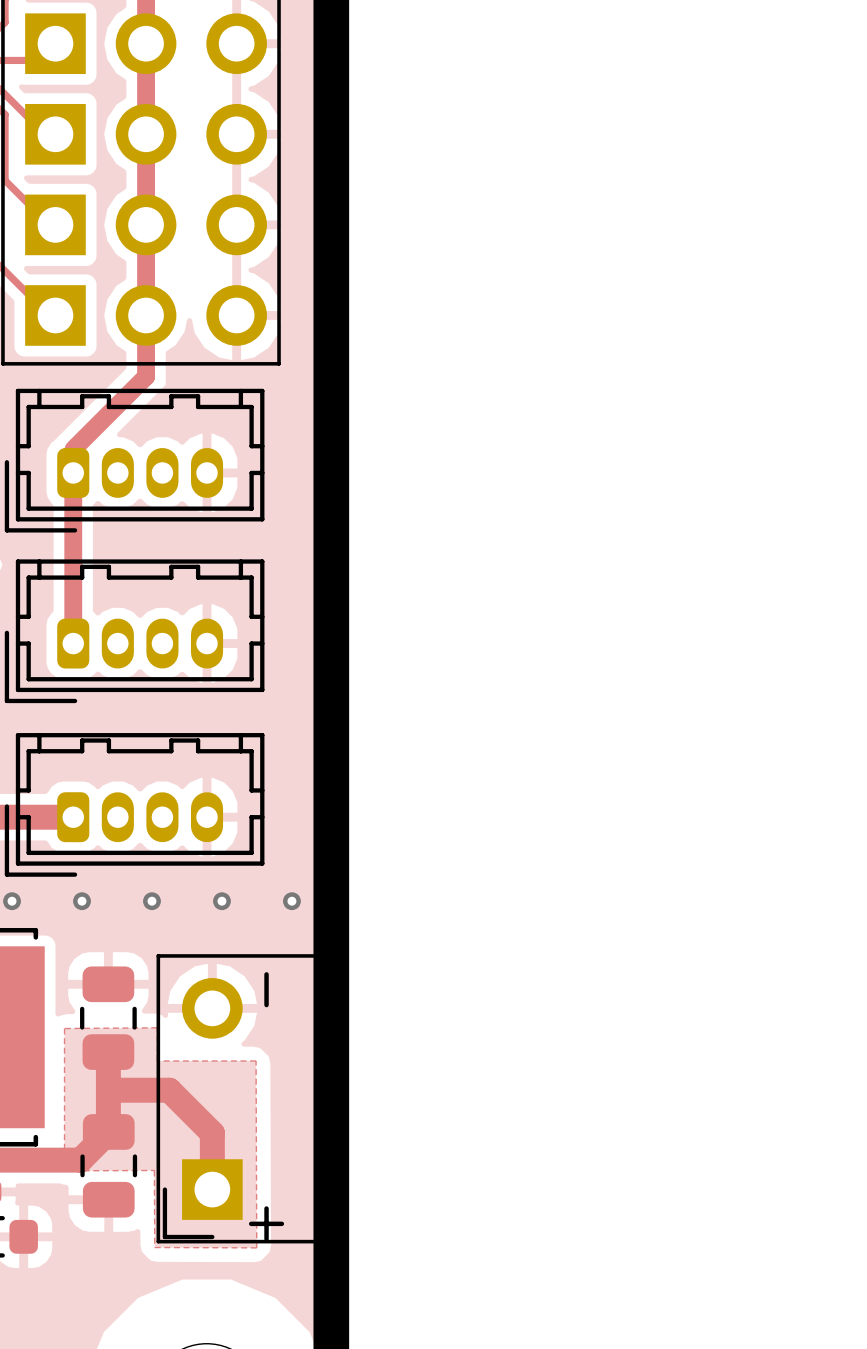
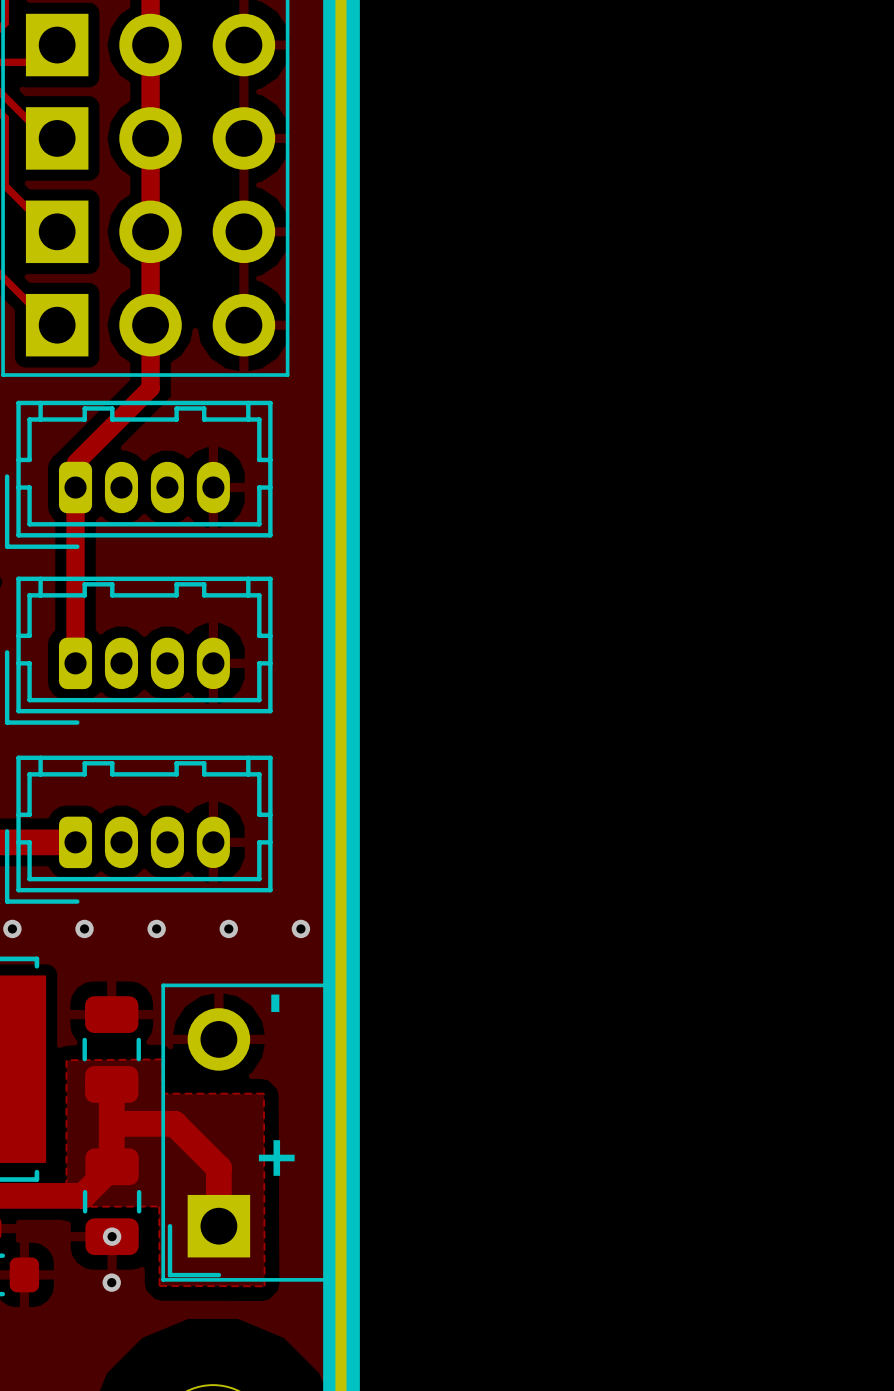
via: none -> (112, 1236)
via: none -> (111, 1282)

